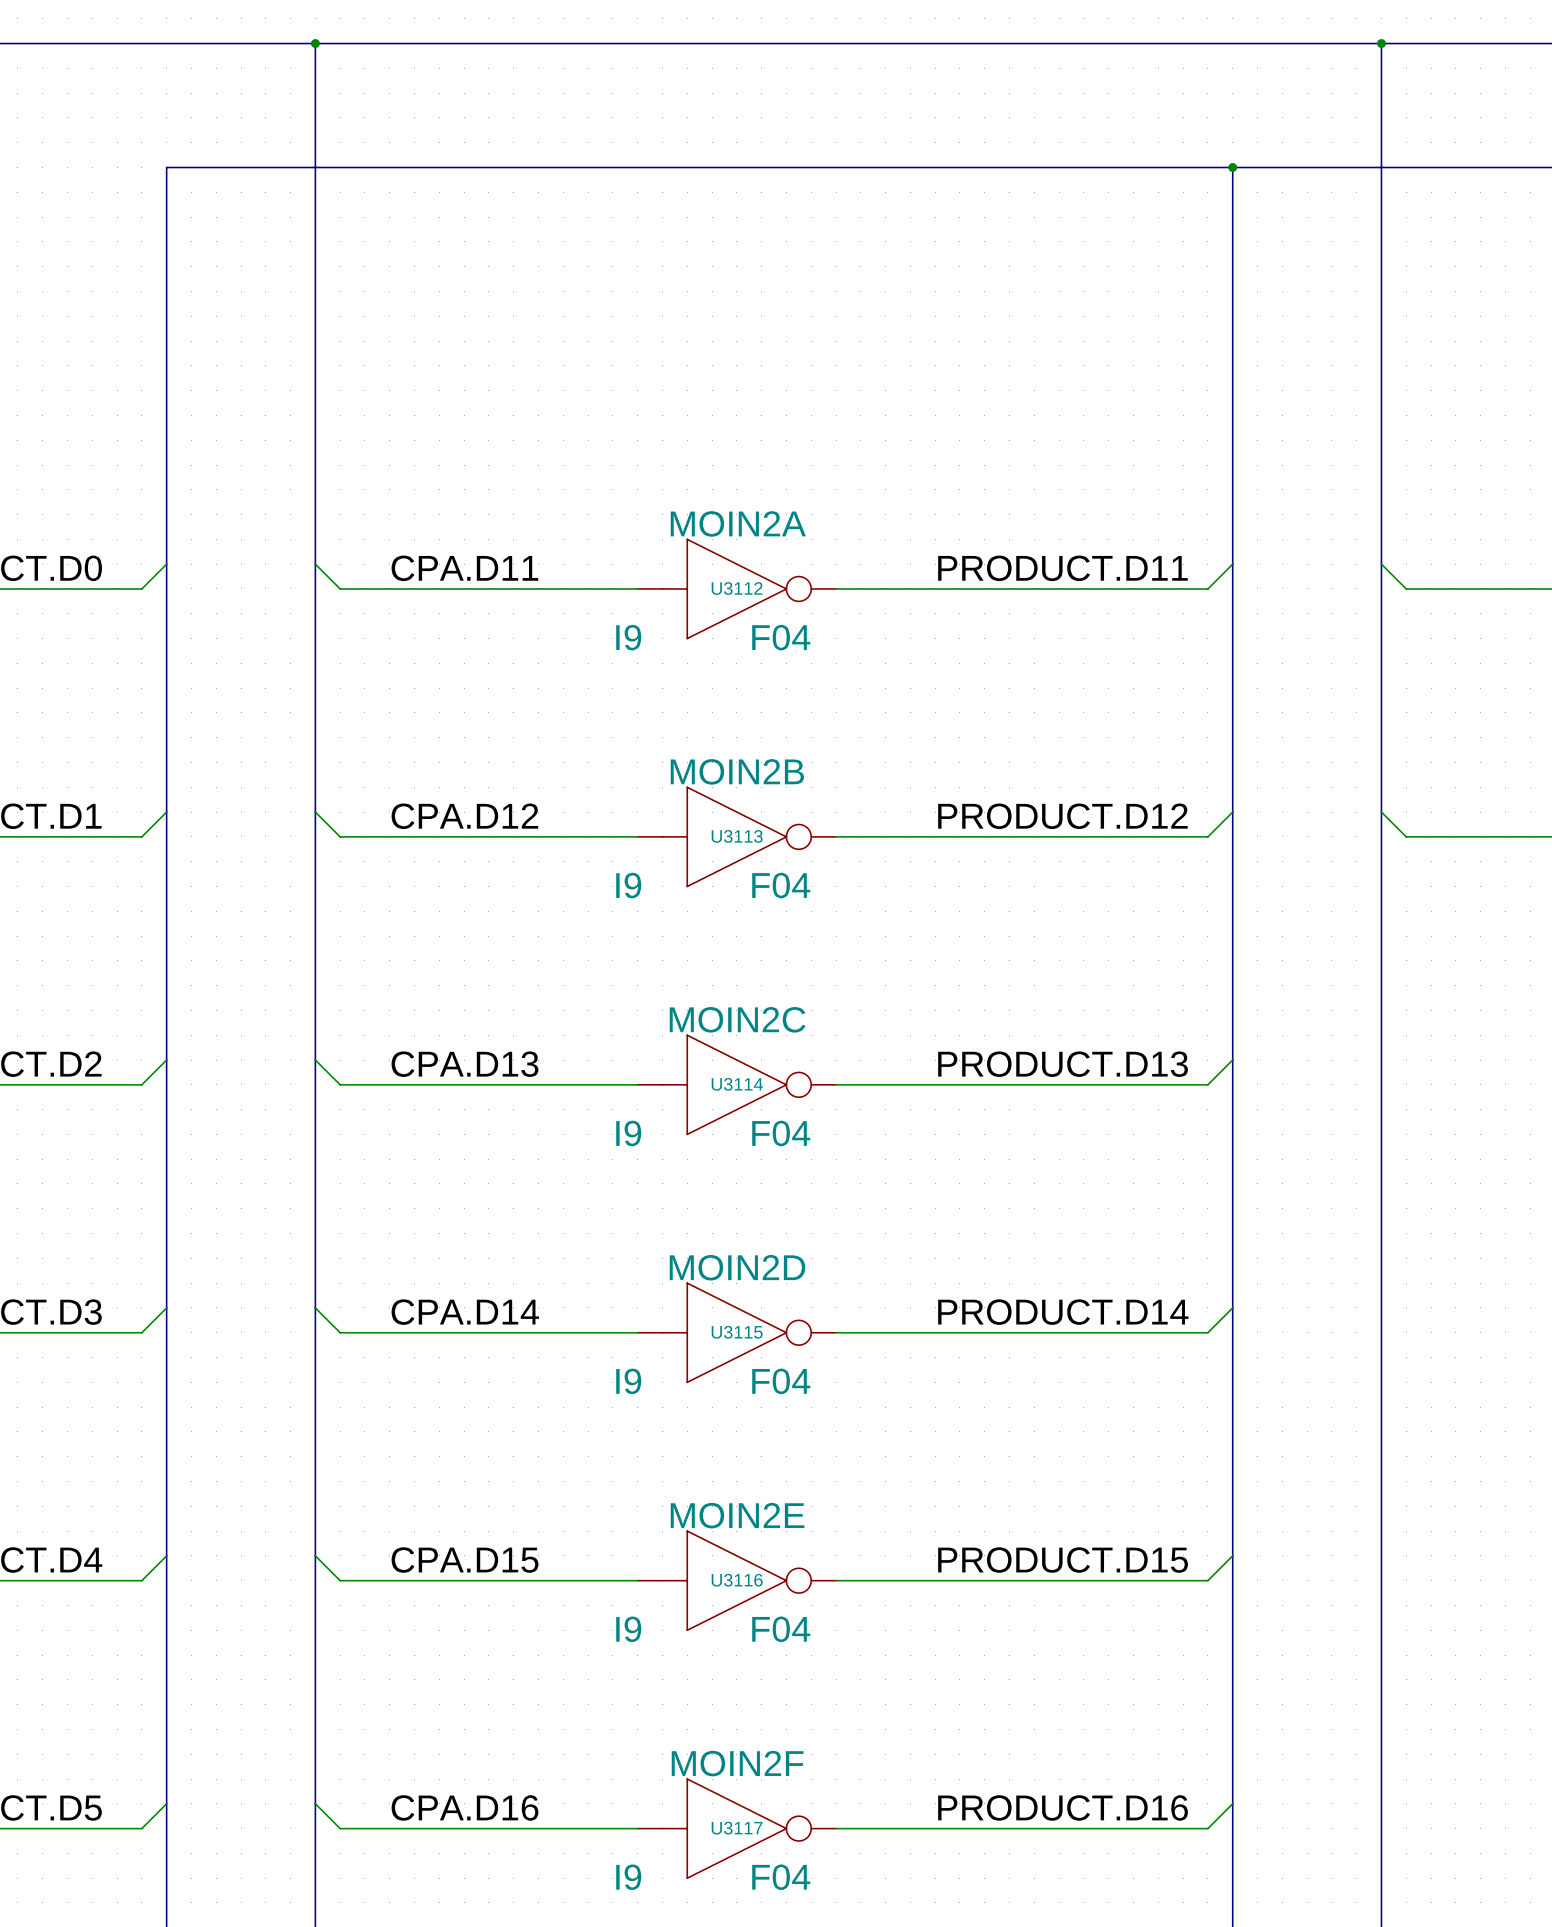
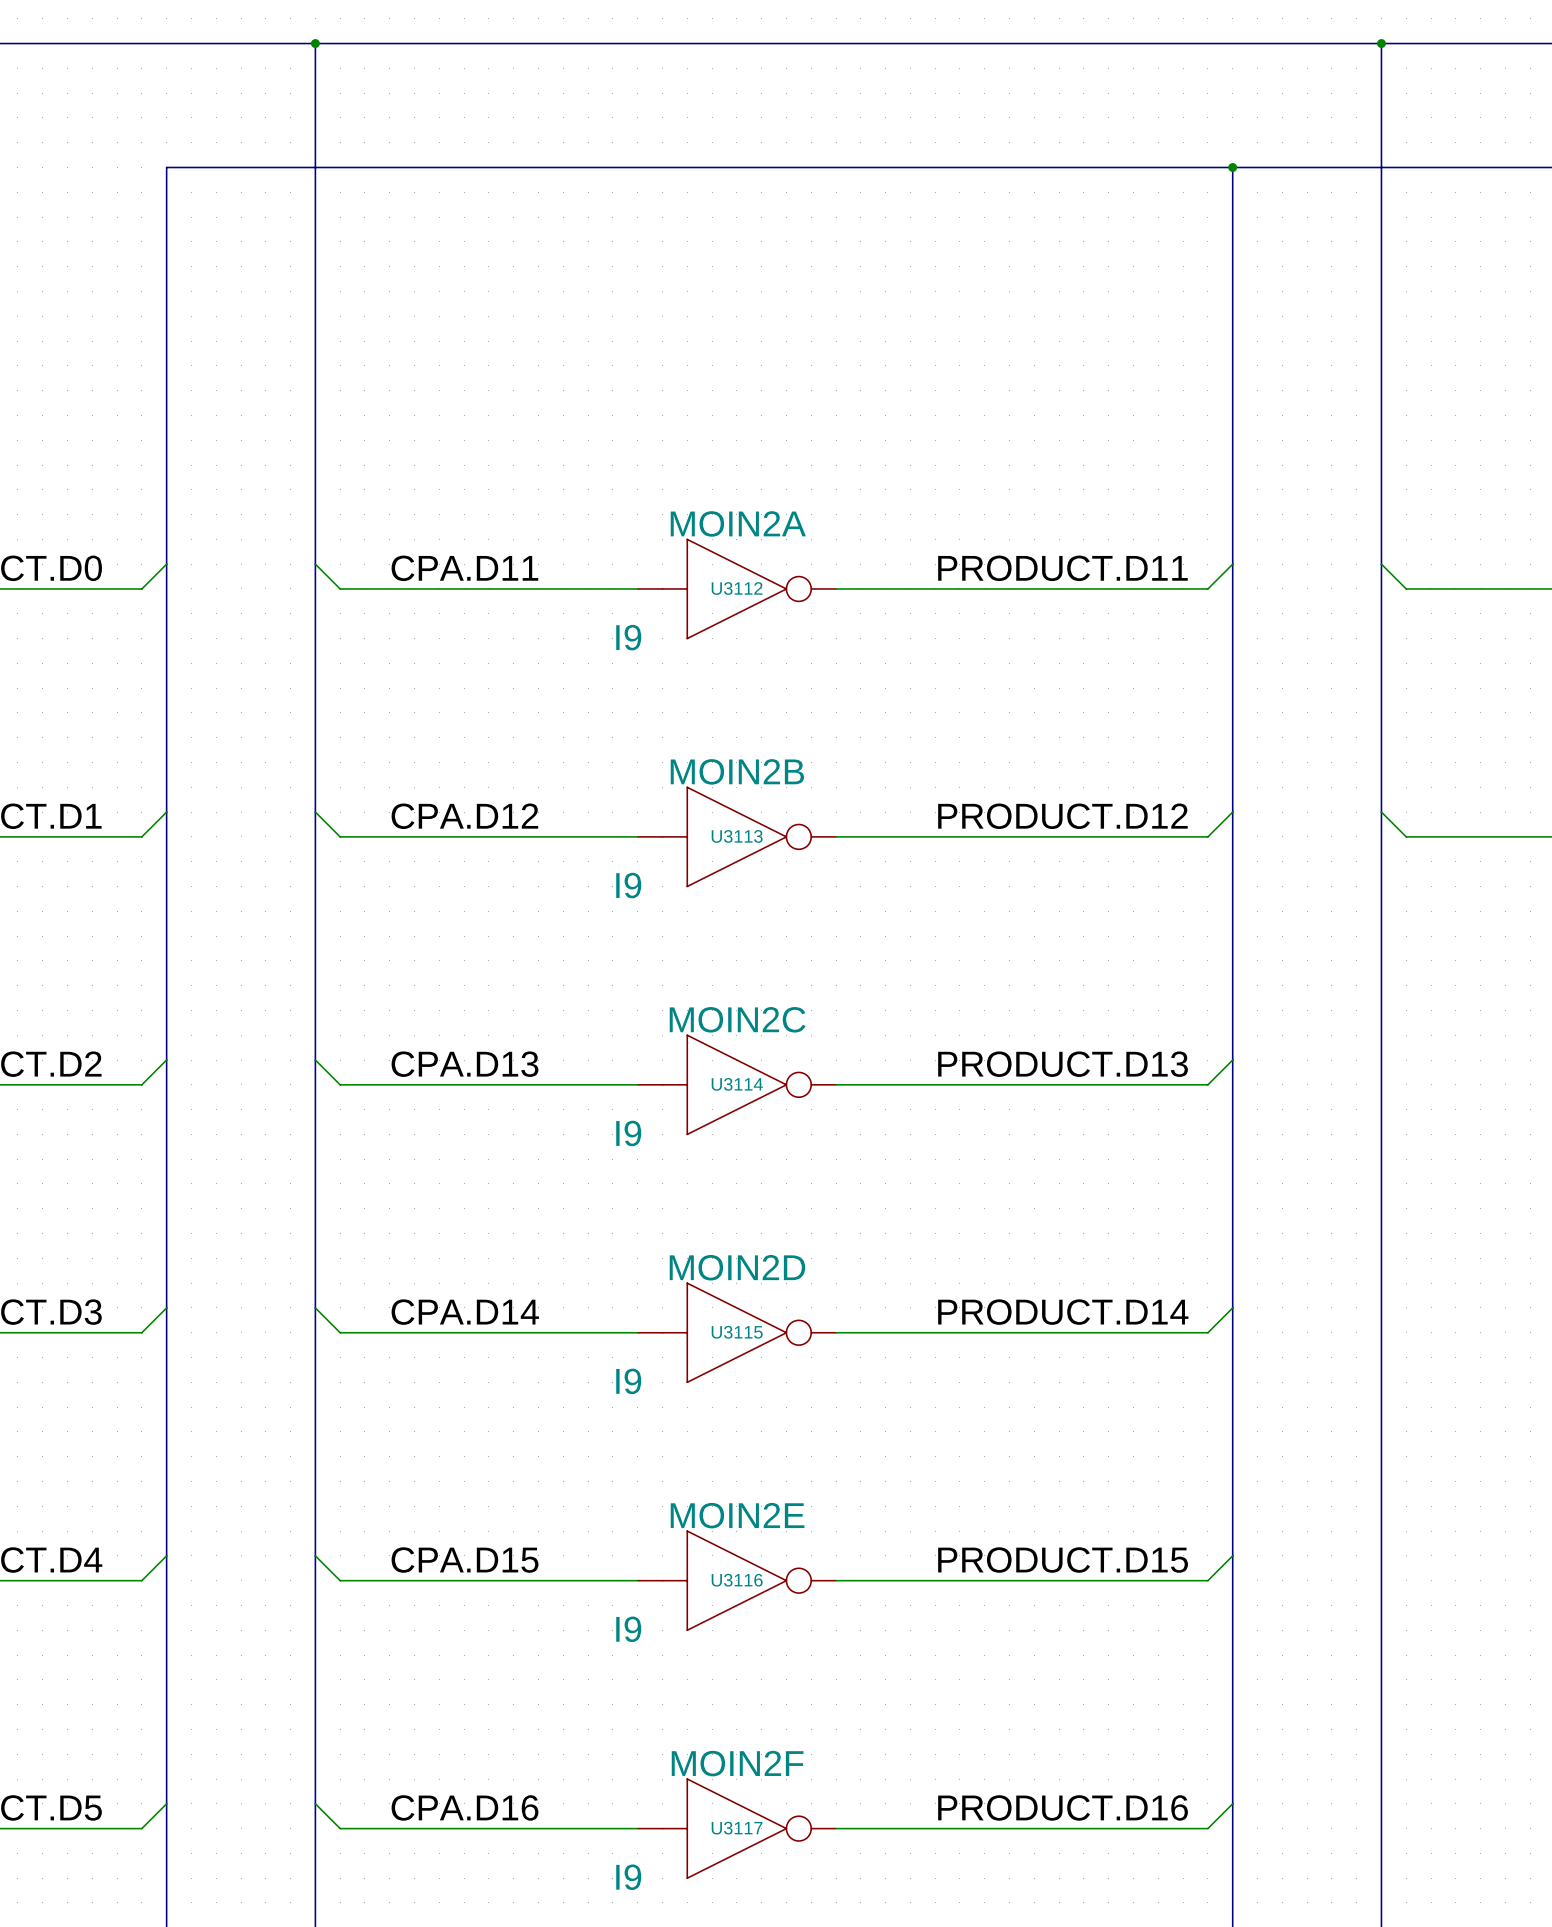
U3112 value: F04 (781, 637) -> none
U3113 value: F04 (781, 885) -> none
U3114 value: F04 (781, 1133) -> none
U3115 value: F04 (781, 1381) -> none
U3116 value: F04 (781, 1629) -> none
U3117 value: F04 (781, 1877) -> none

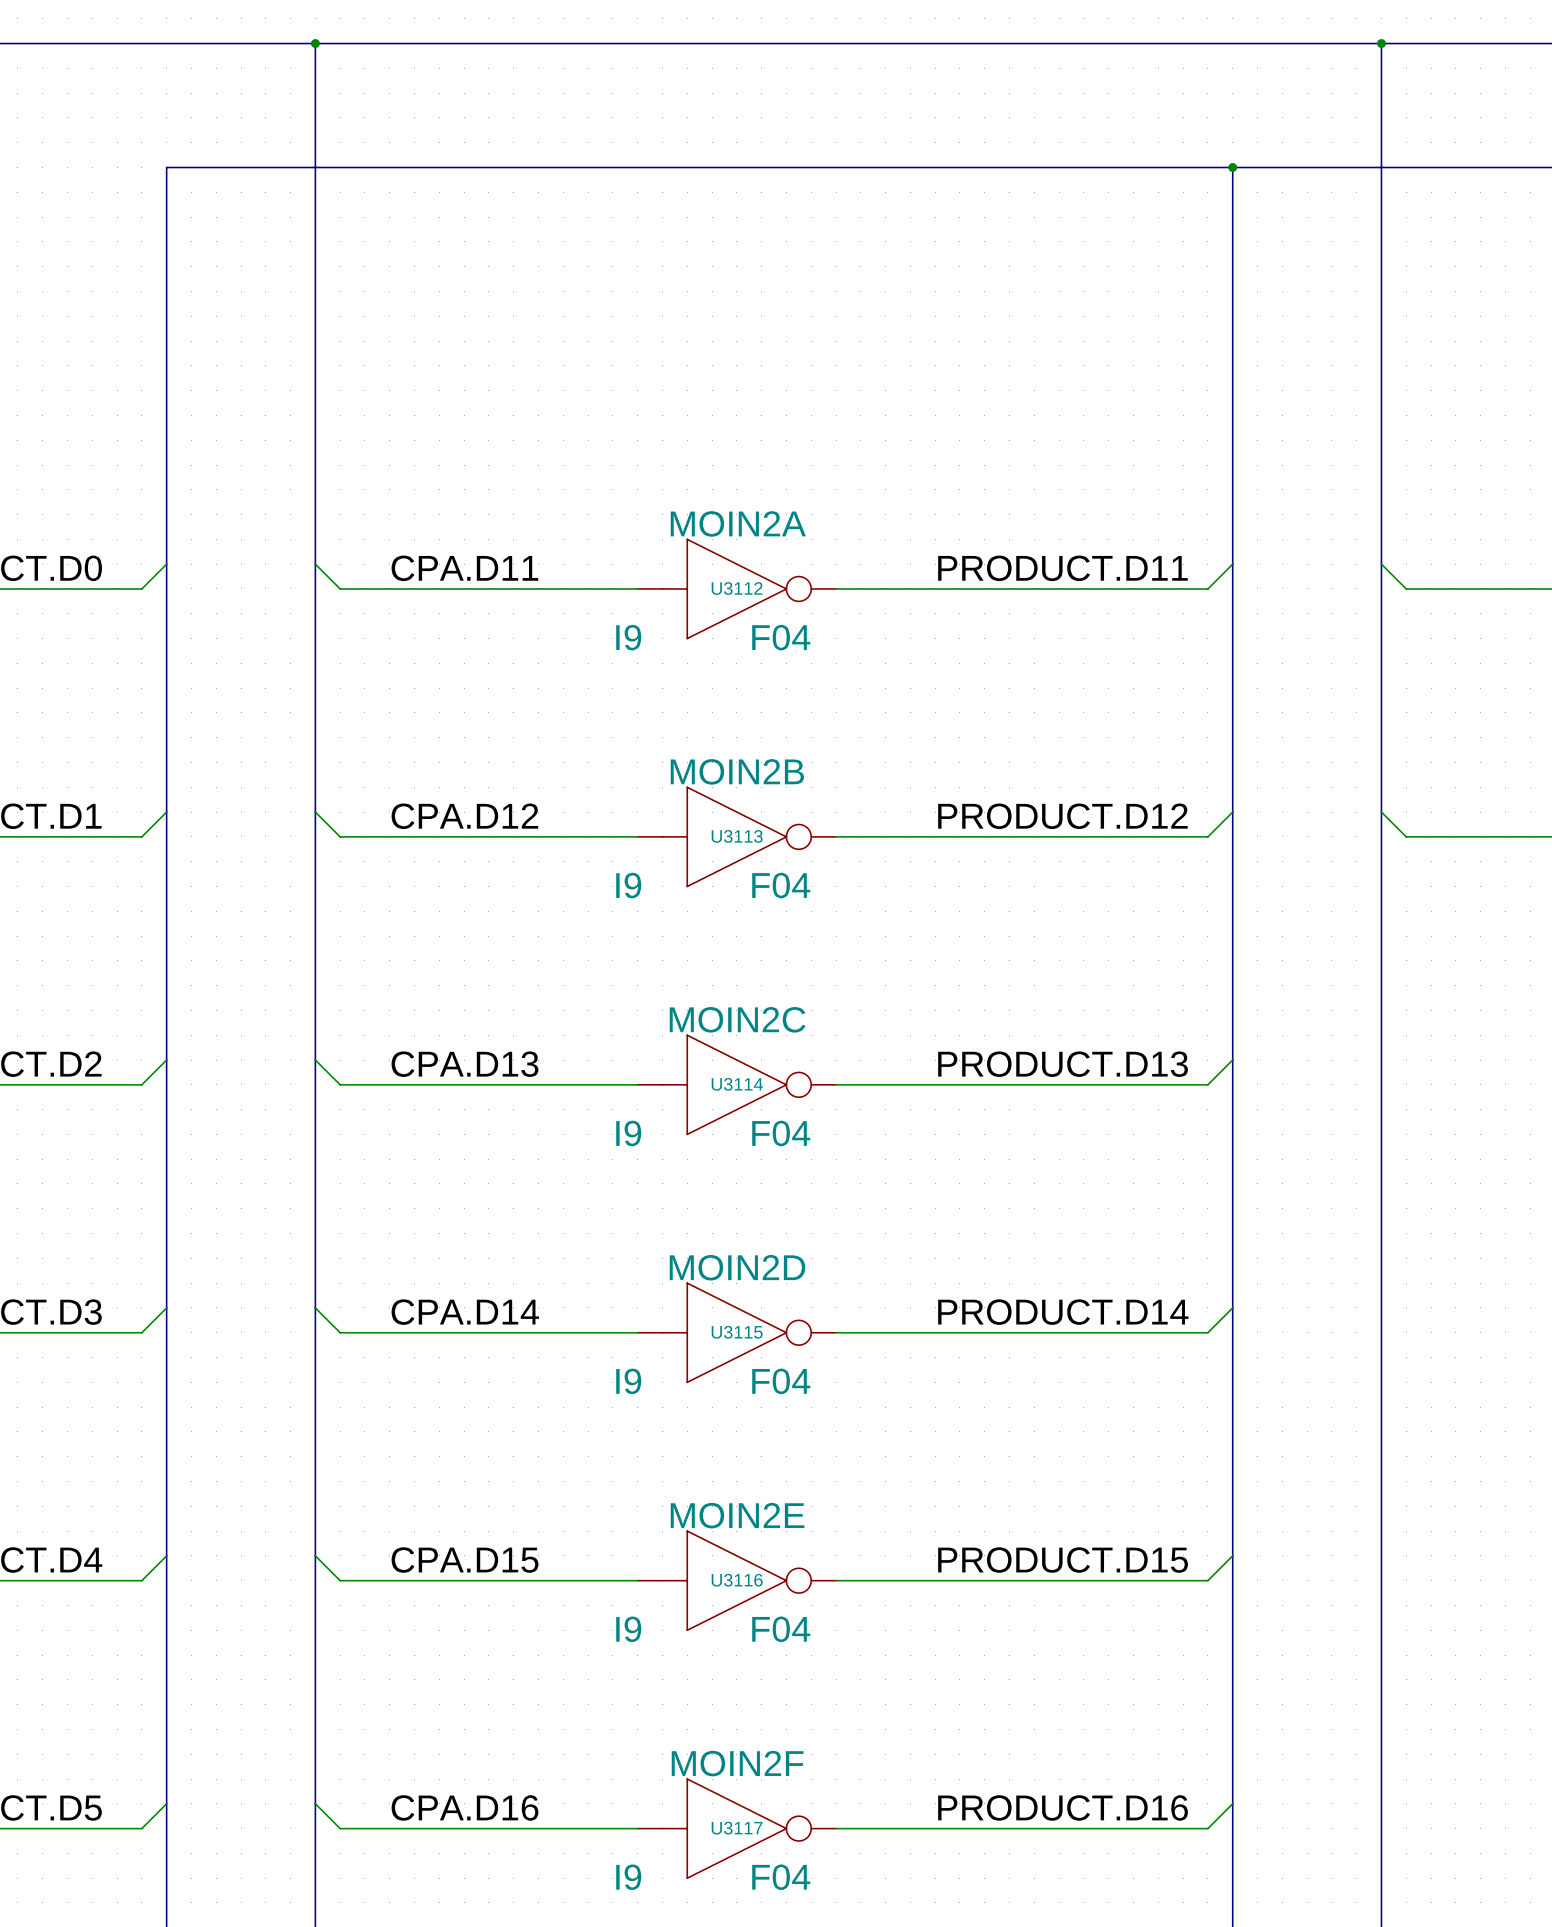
U3112 value: none -> F04 (781, 637)
U3113 value: none -> F04 (781, 885)
U3114 value: none -> F04 (781, 1133)
U3115 value: none -> F04 (781, 1381)
U3116 value: none -> F04 (781, 1629)
U3117 value: none -> F04 (781, 1877)

